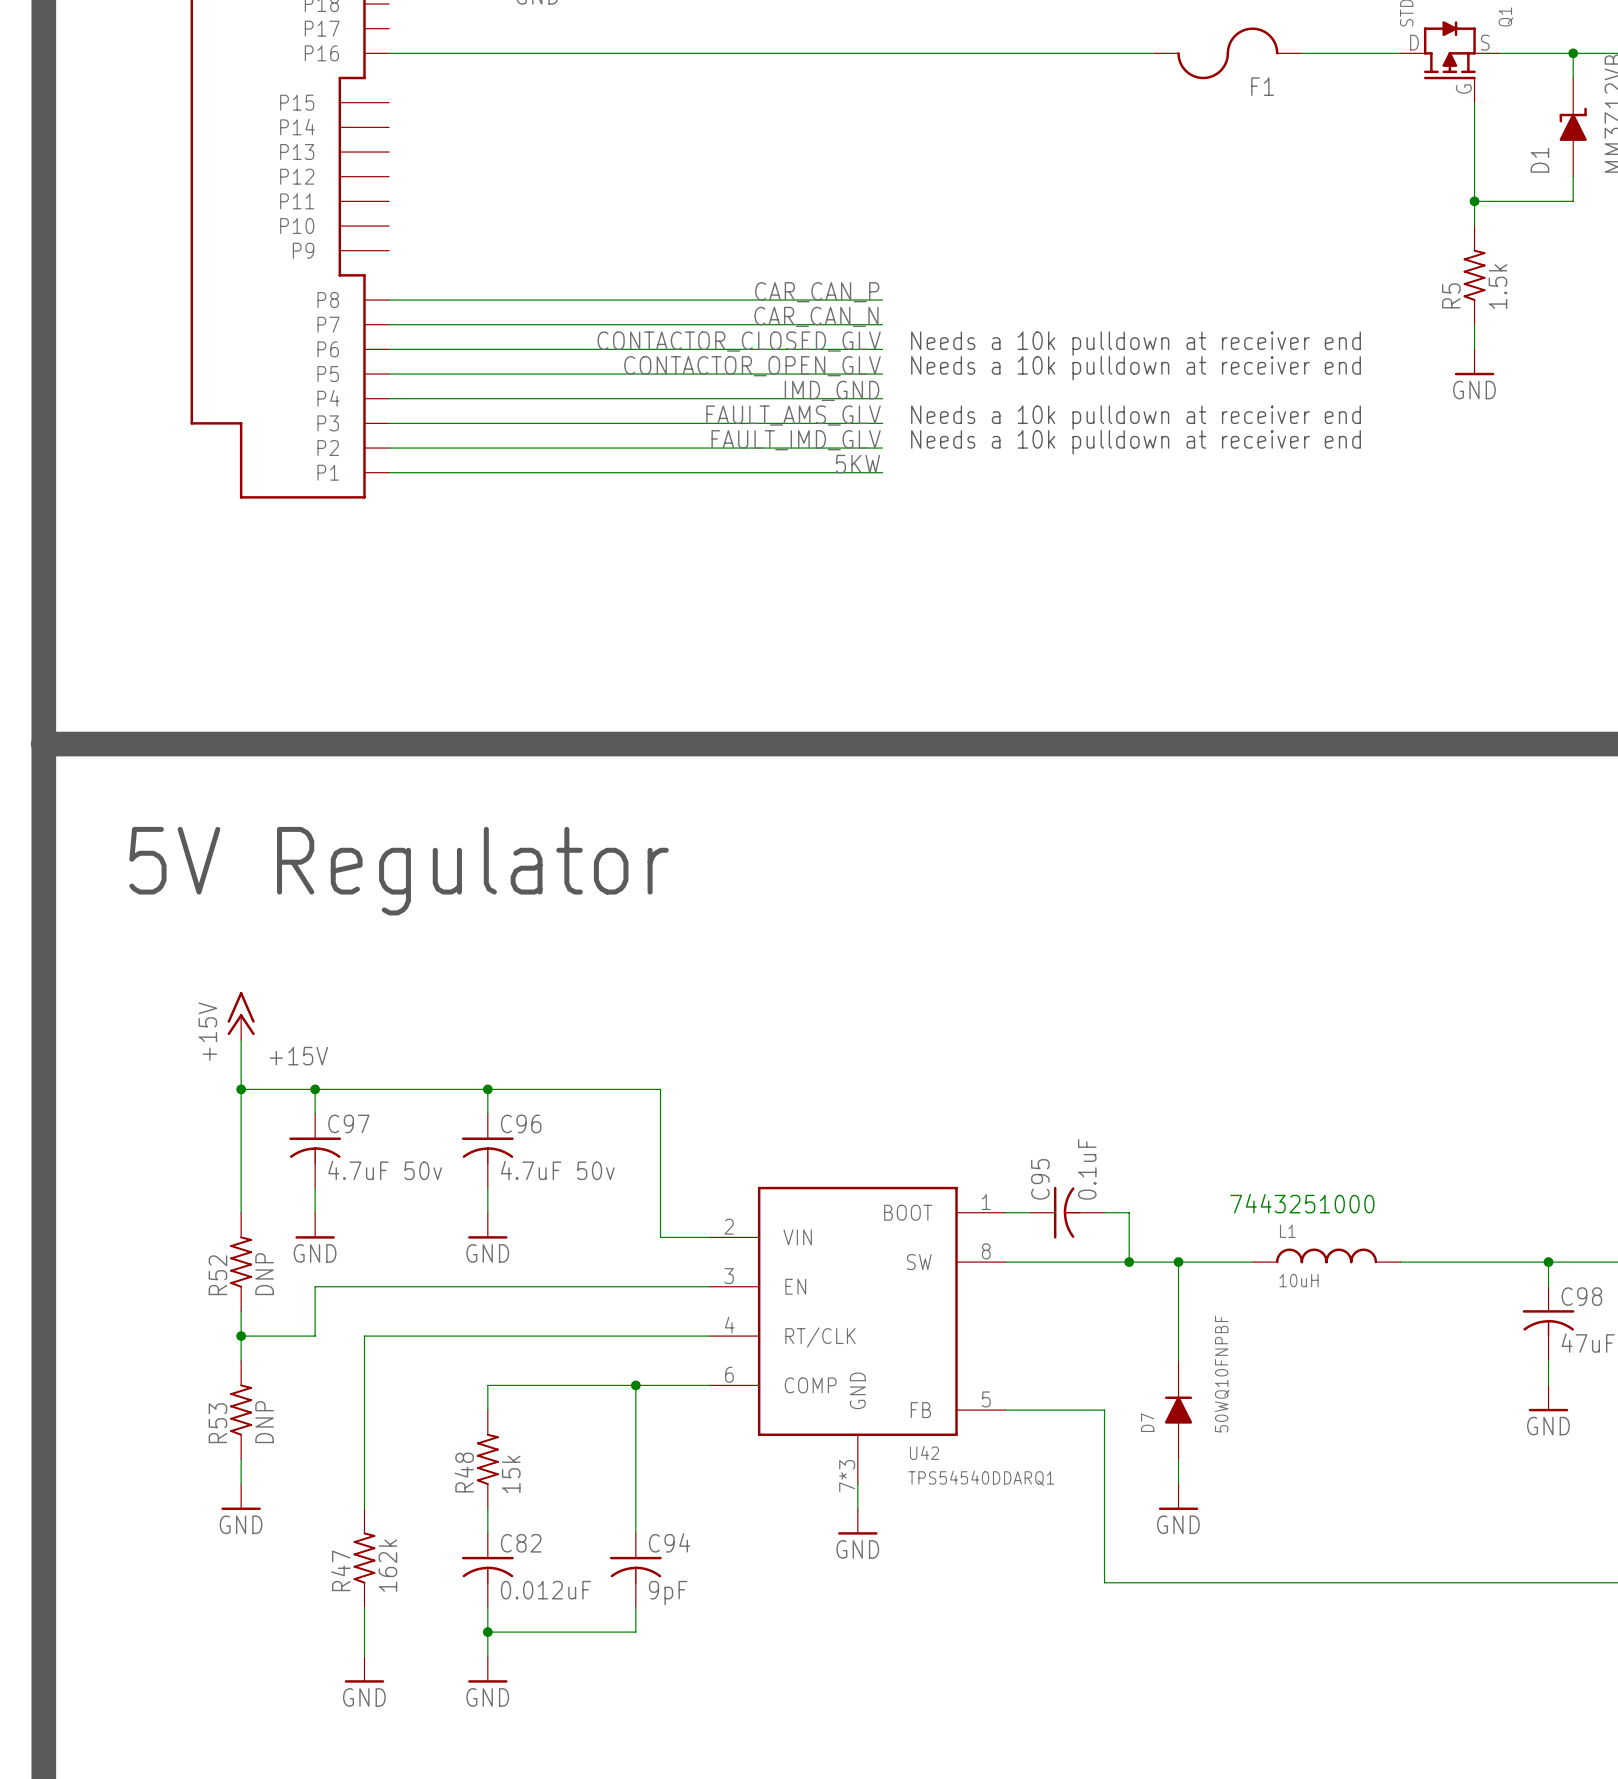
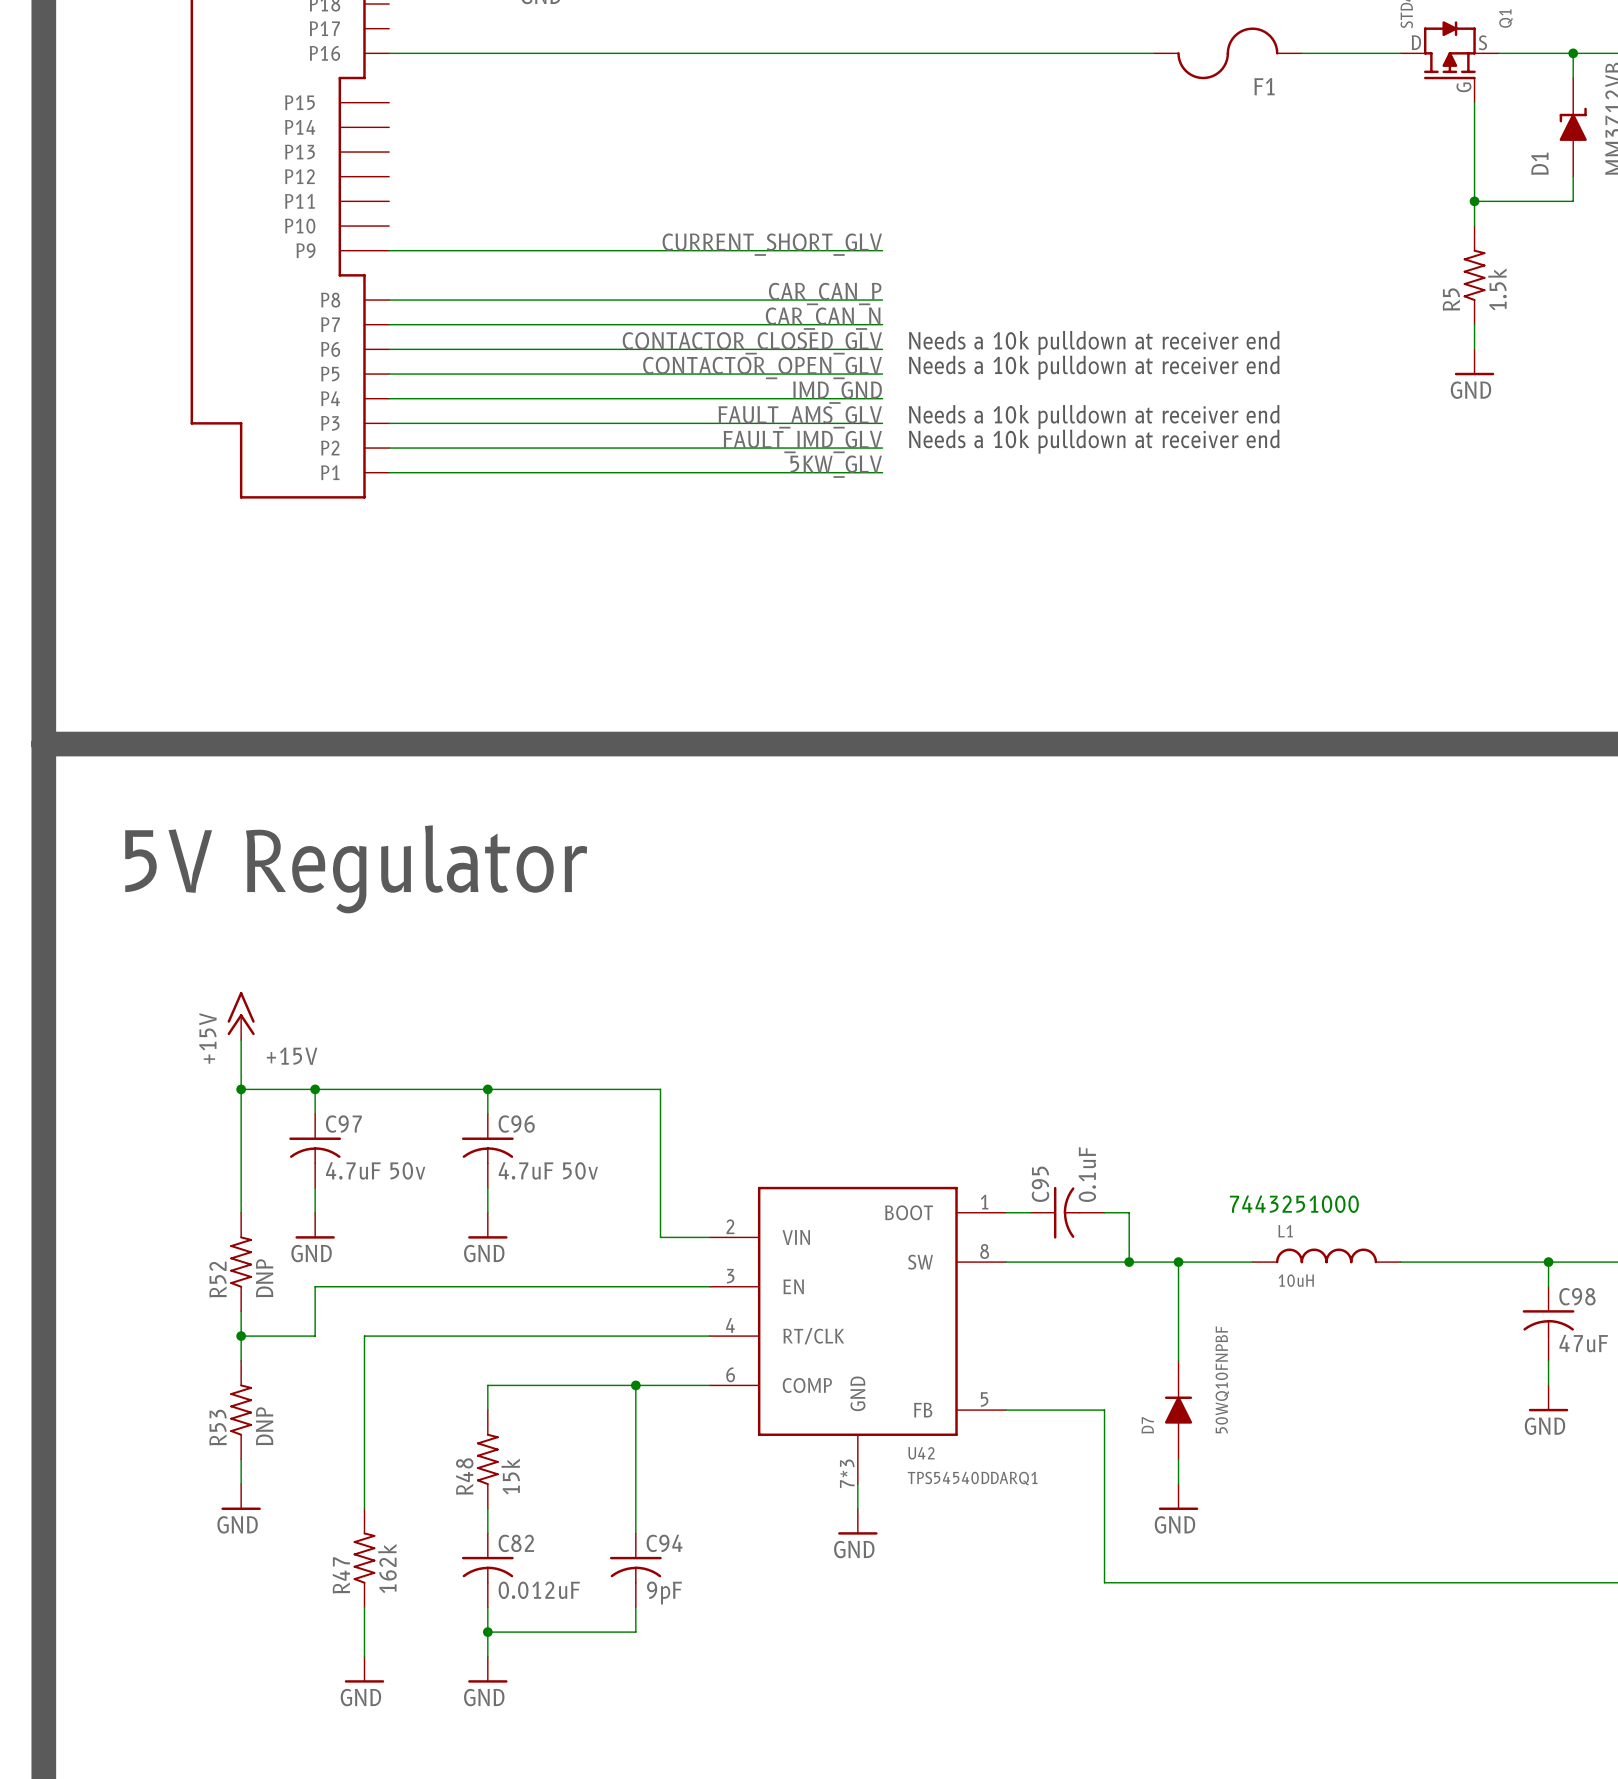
label: none -> CURRENT_SHORT_GLV (772, 244)
wire: none -> (389, 250) (882, 250)
label: 5KW (857, 464) -> 5KW_GLV (836, 466)

